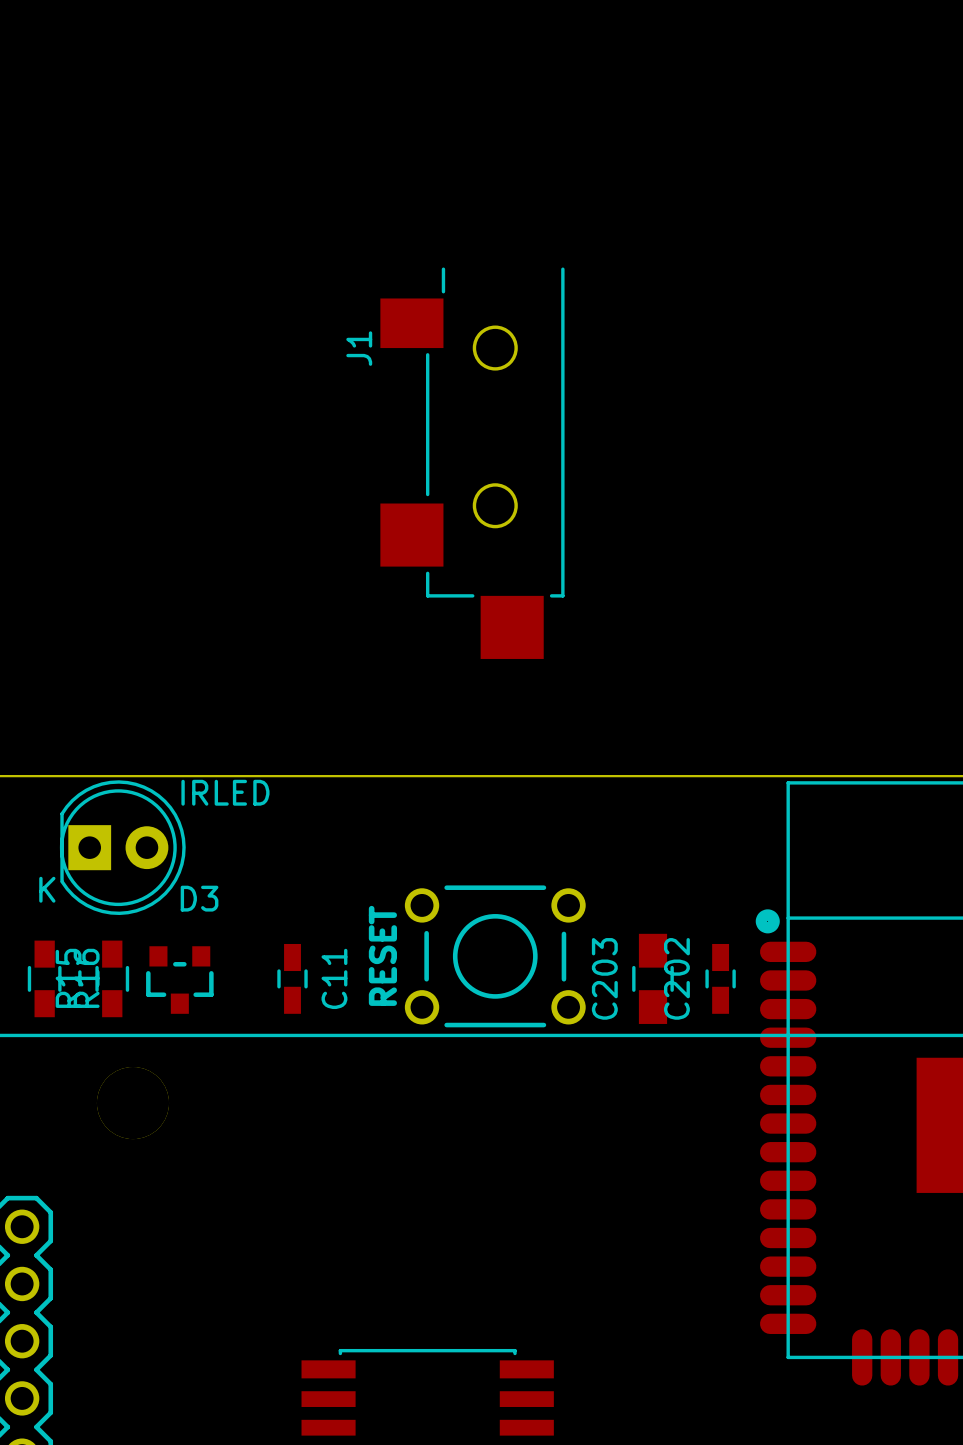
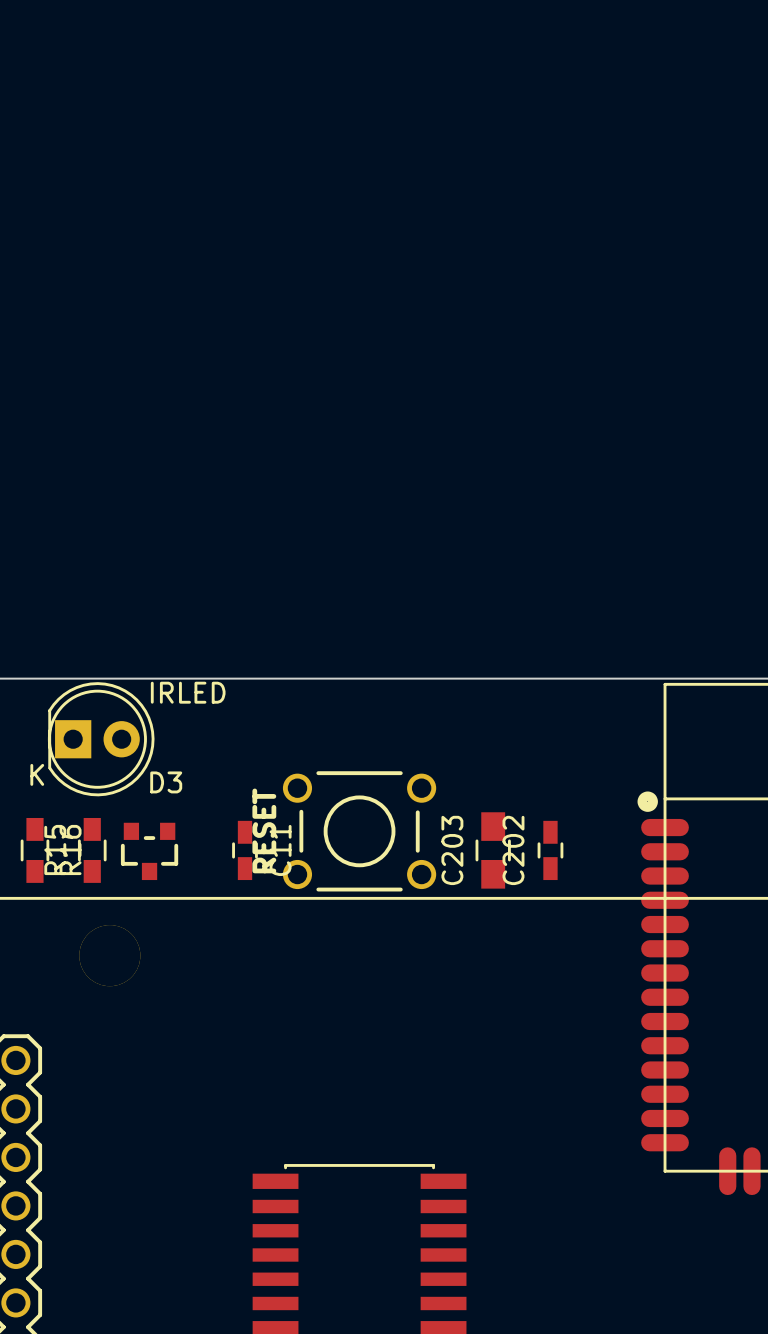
J1: (472, 463) -> none
part position: (495, 956) -> (359, 831)
C203 position: (652, 978) -> (493, 850)
C202 position: (720, 978) -> (550, 850)

